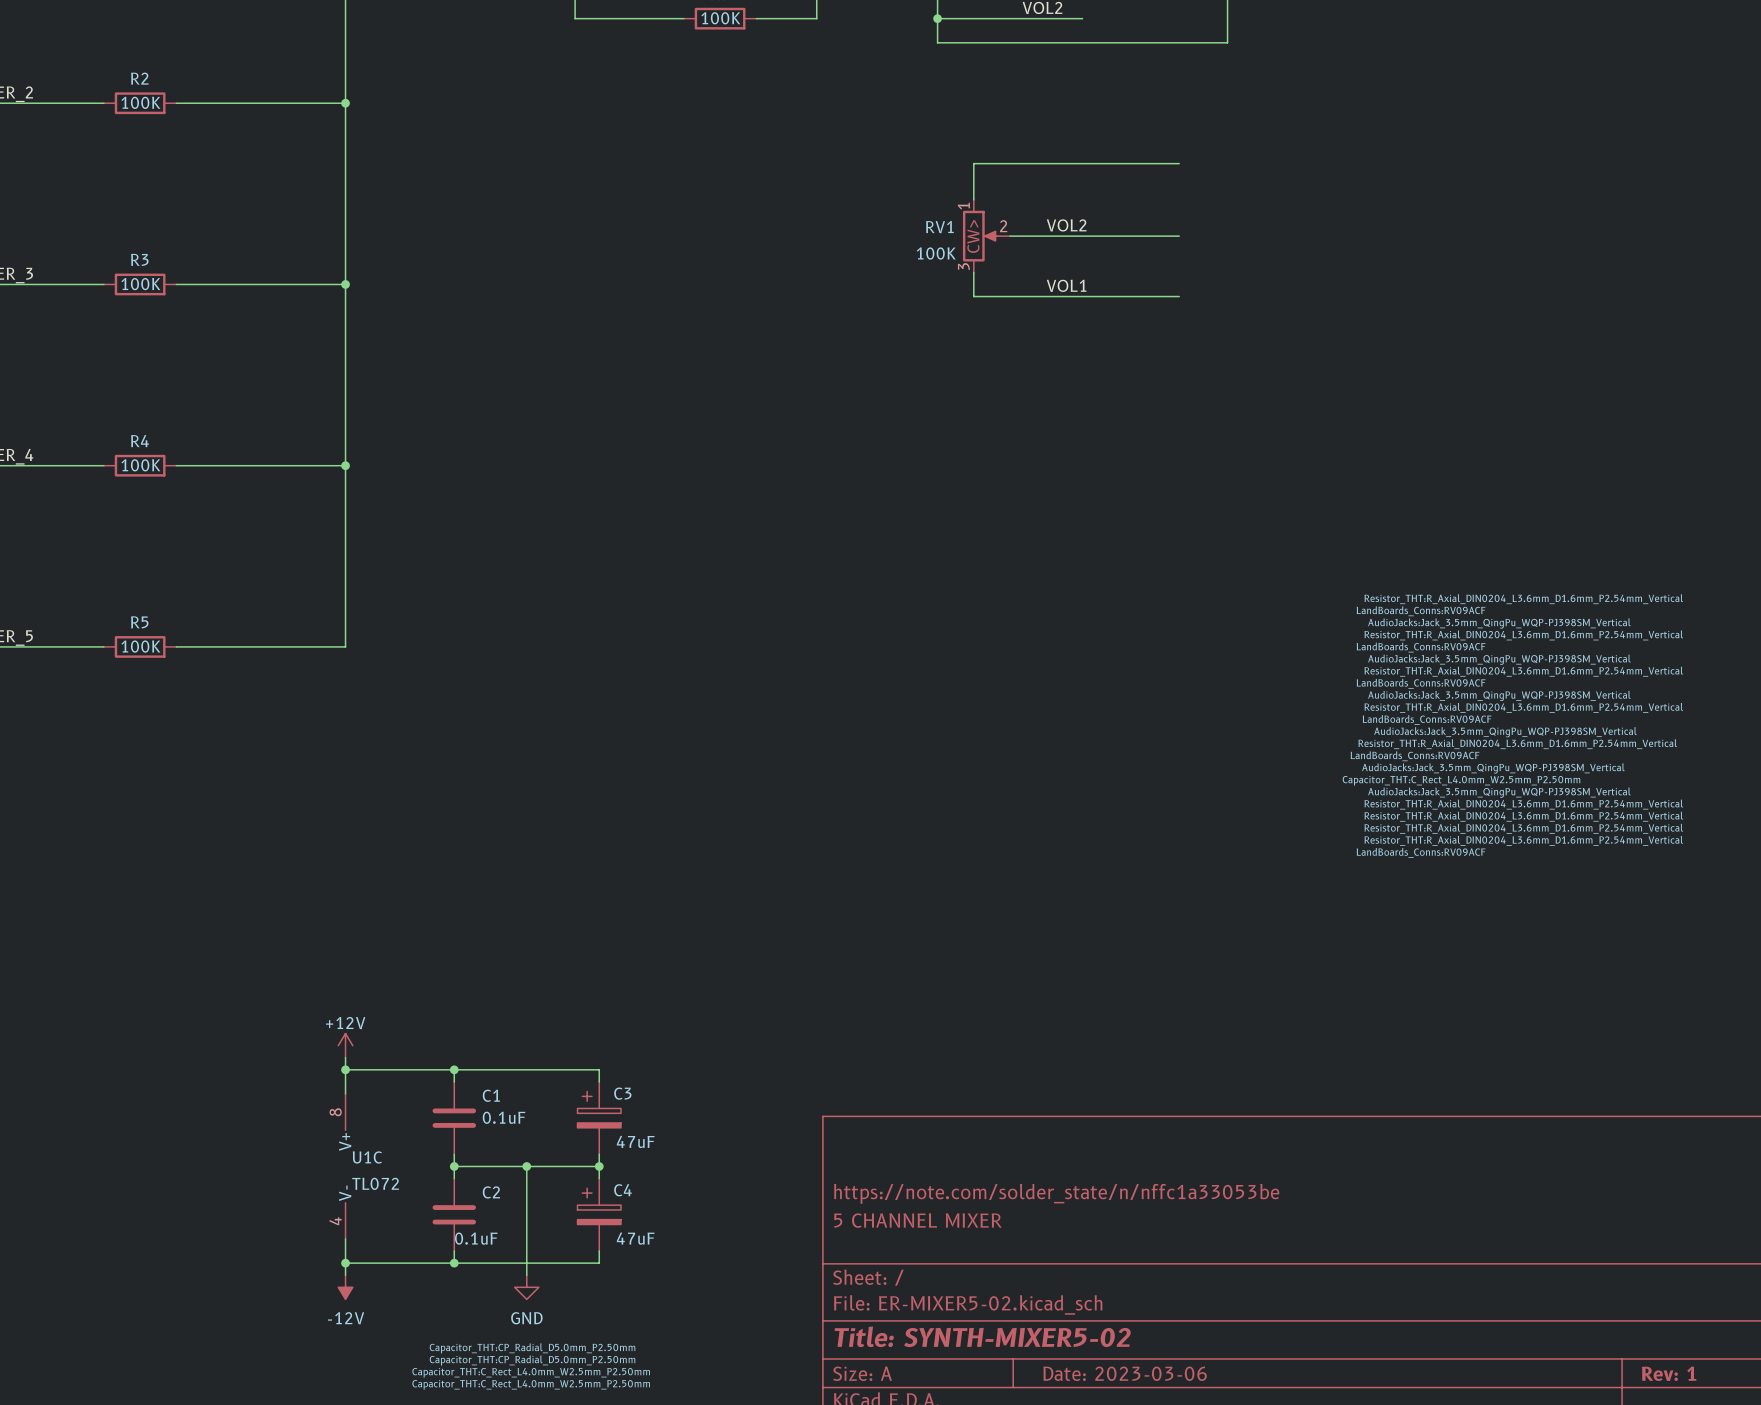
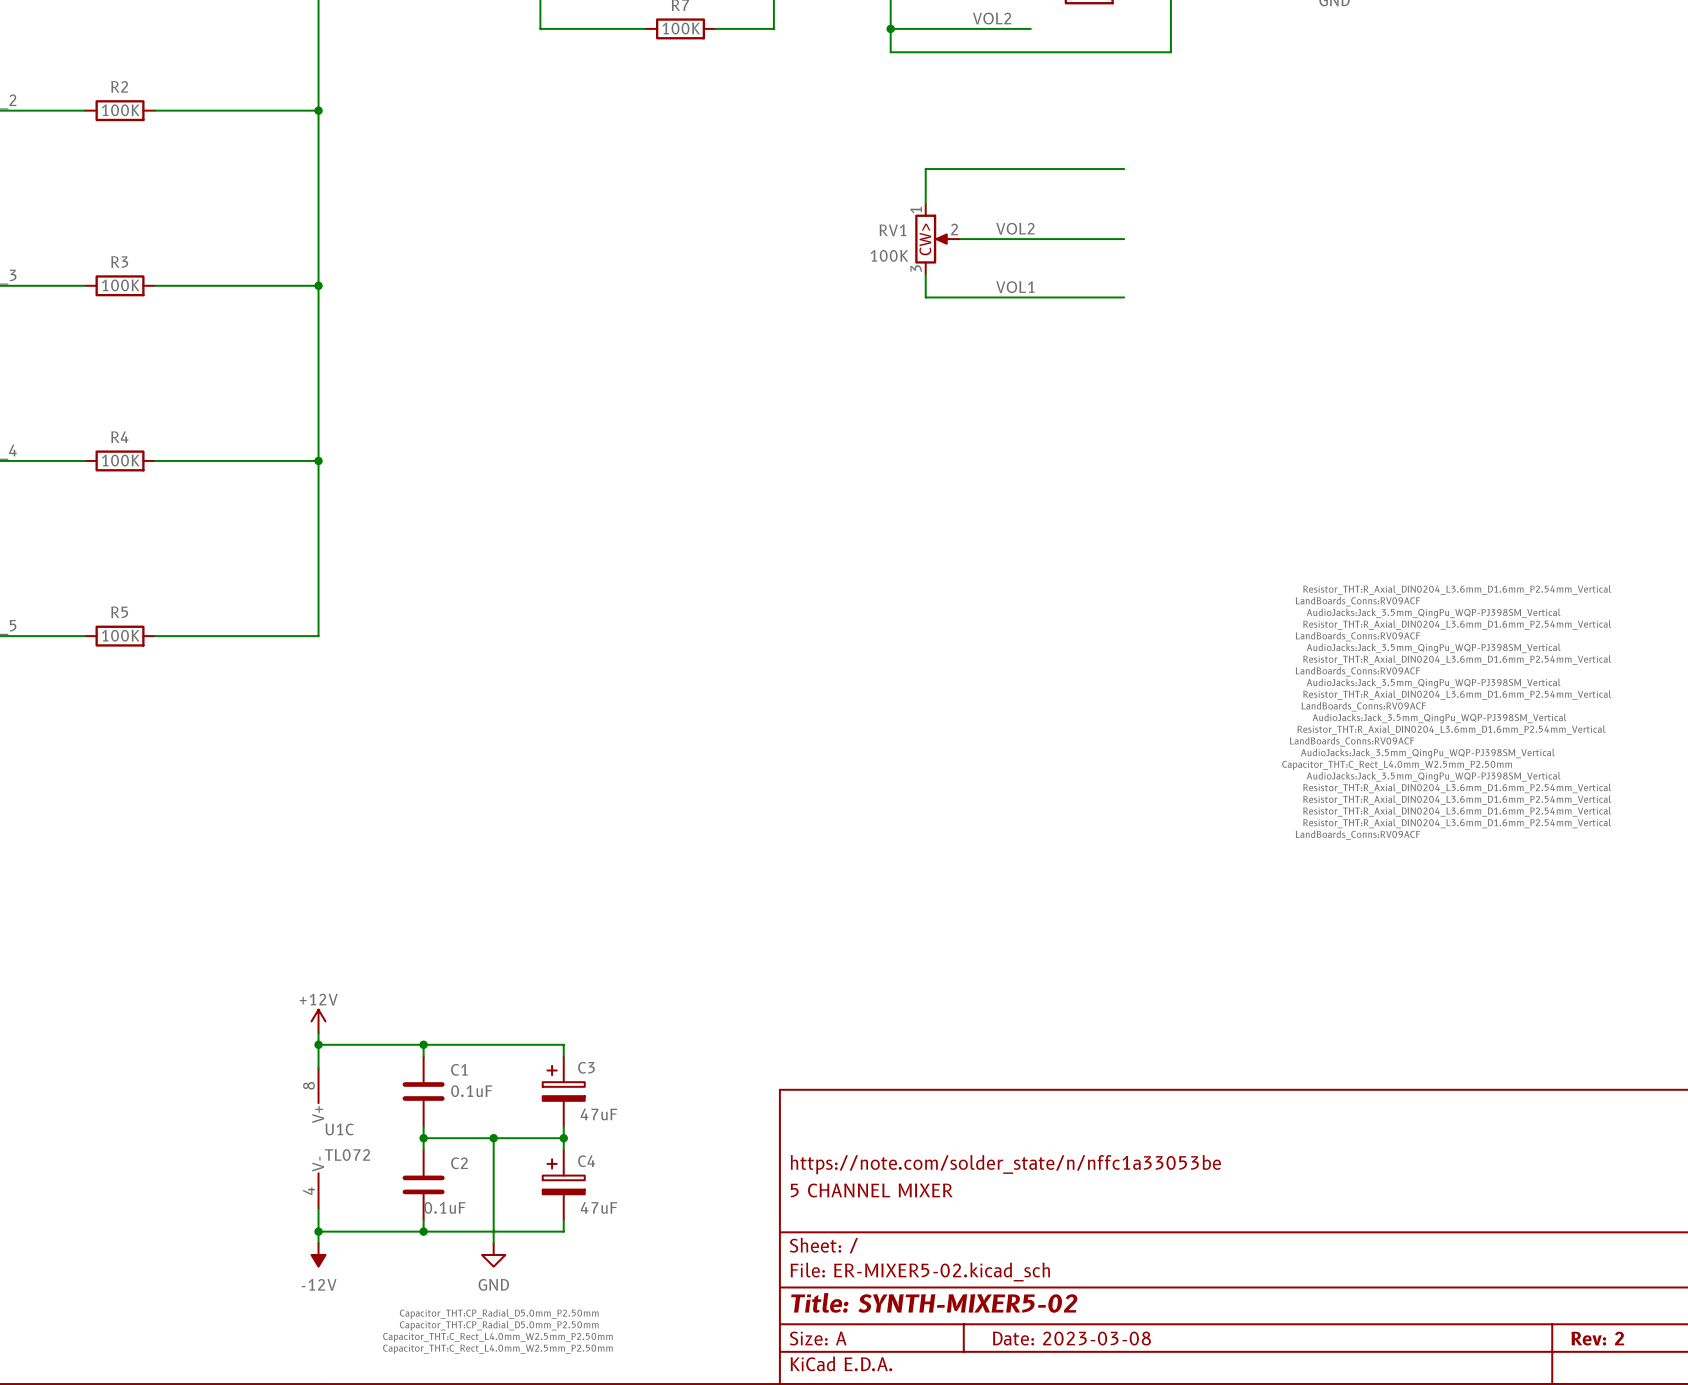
title block: Date: 2023-03-06 (1125, 1373) -> Date: 2023-03-08 (1071, 1338)
title block: Rev: 1 (1669, 1373) -> Rev: 2 (1597, 1338)

